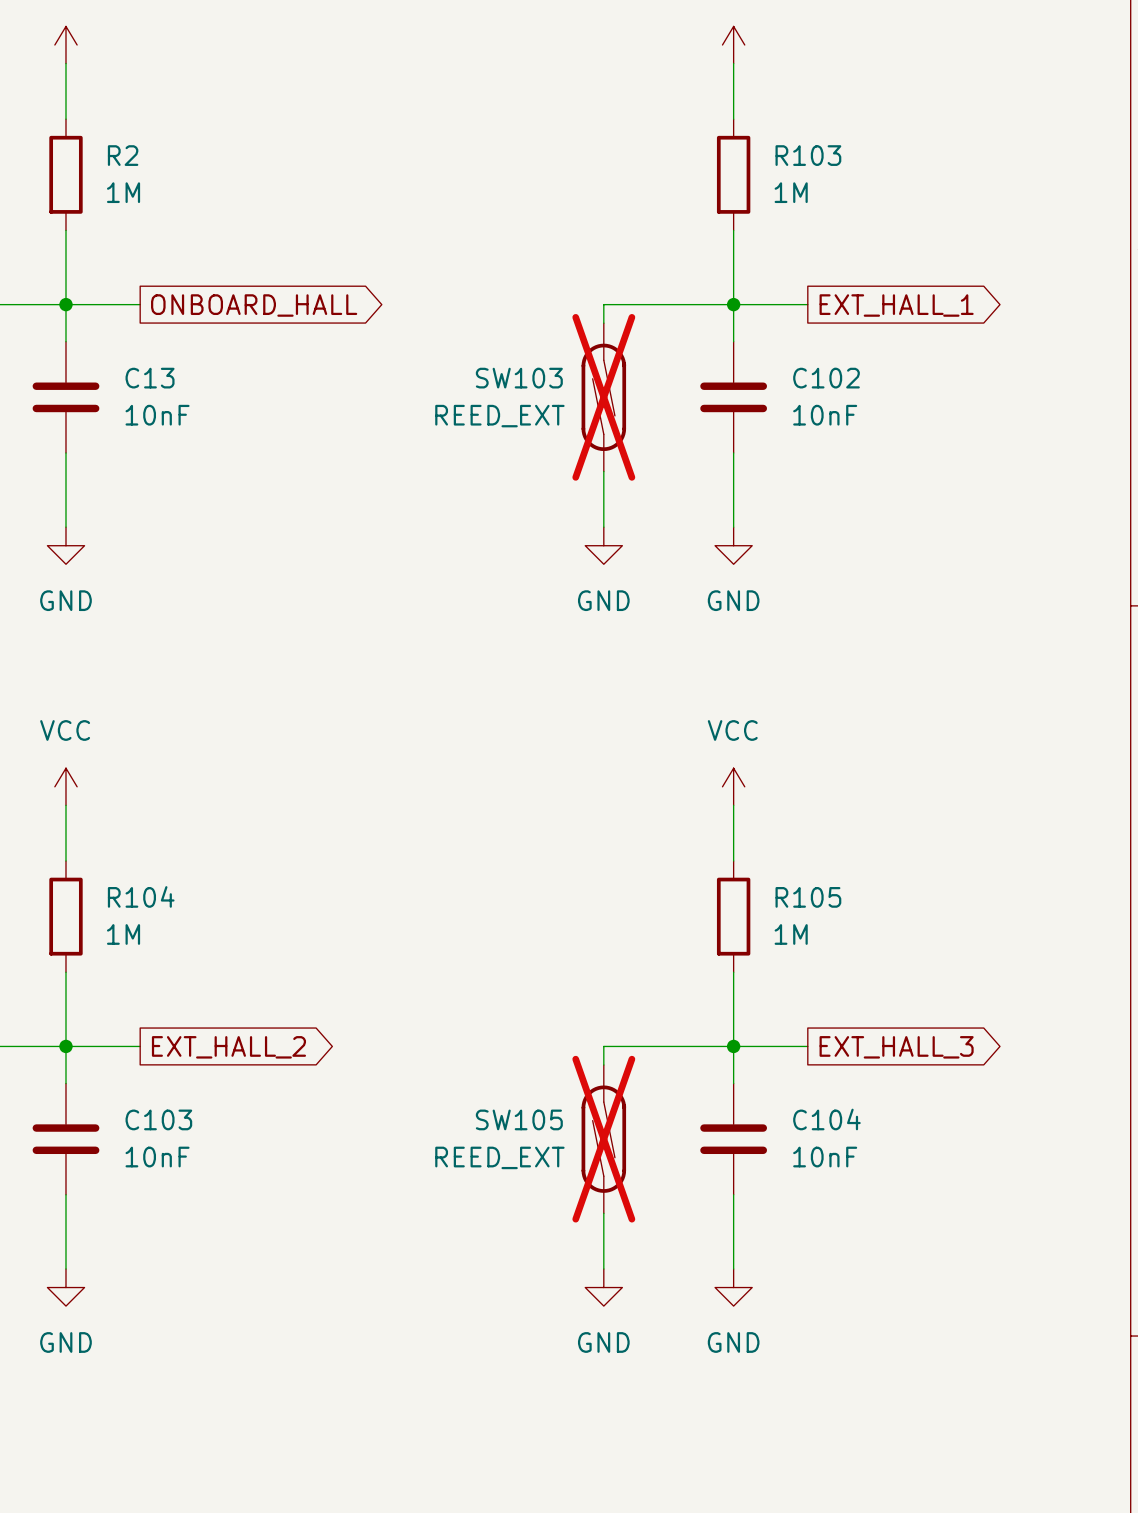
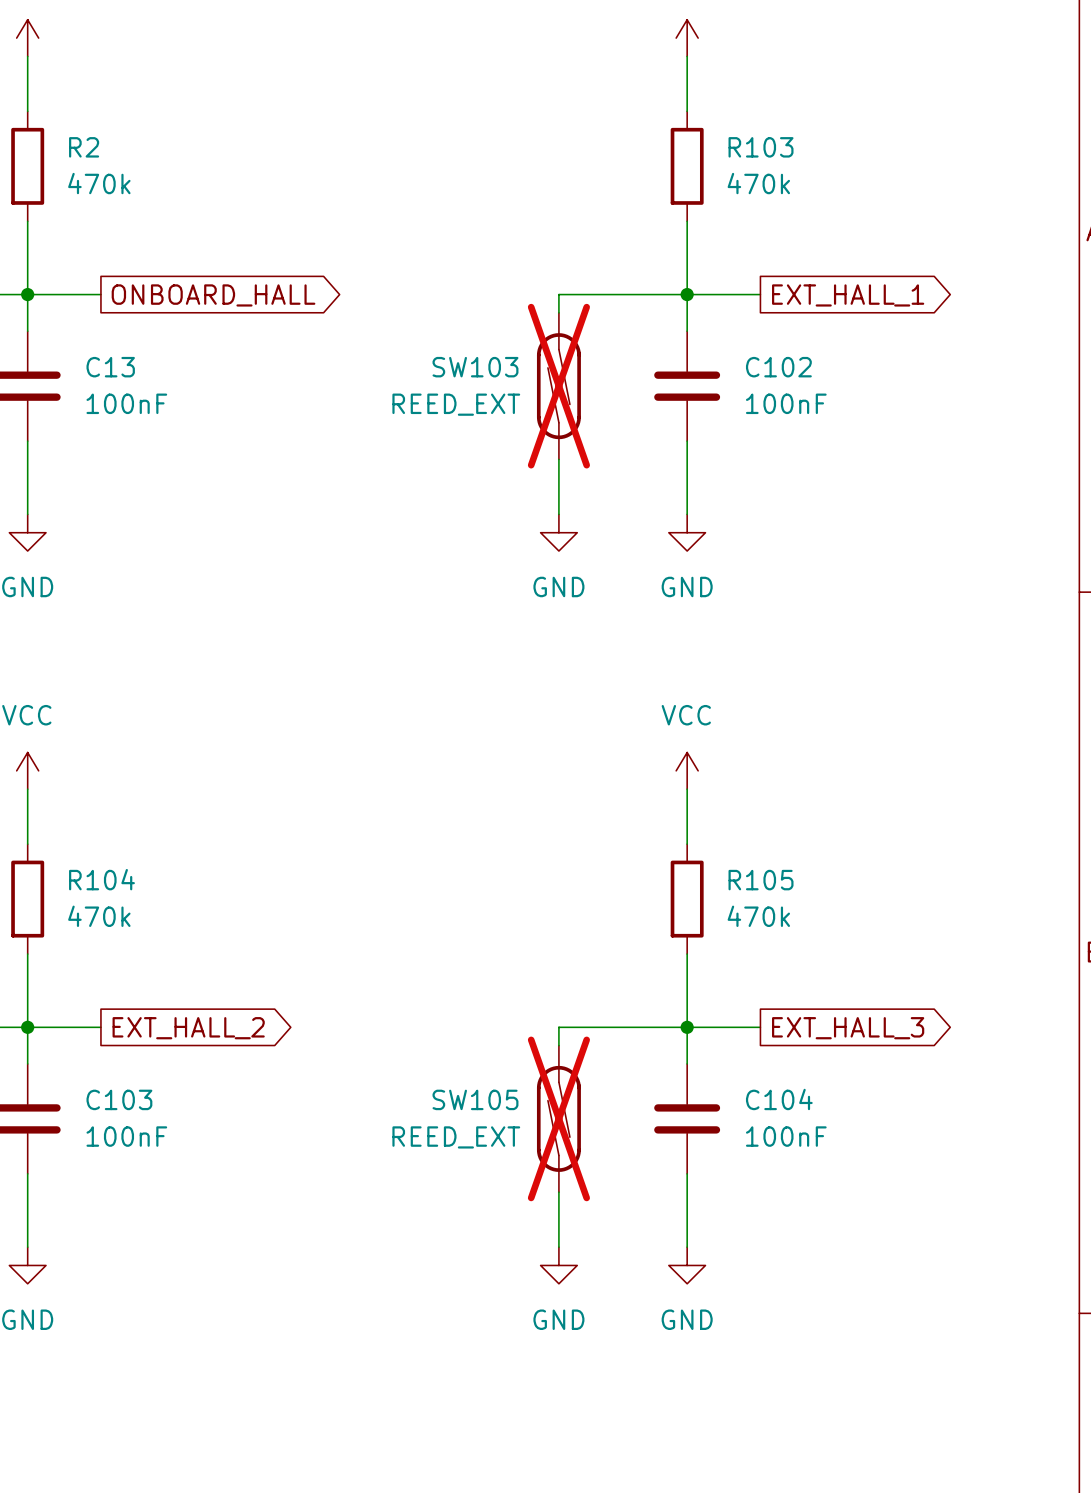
R2 value: 1M (123, 192) -> 470k (99, 183)
R103 value: 1M (791, 192) -> 470k (758, 183)
C13 value: 10nF (157, 415) -> 100nF (126, 403)
C102 value: 10nF (825, 415) -> 100nF (786, 403)
R104 value: 1M (123, 934) -> 470k (99, 916)
R105 value: 1M (791, 934) -> 470k (758, 916)
C103 value: 10nF (157, 1157) -> 100nF (126, 1136)
C104 value: 10nF (825, 1157) -> 100nF (786, 1136)

